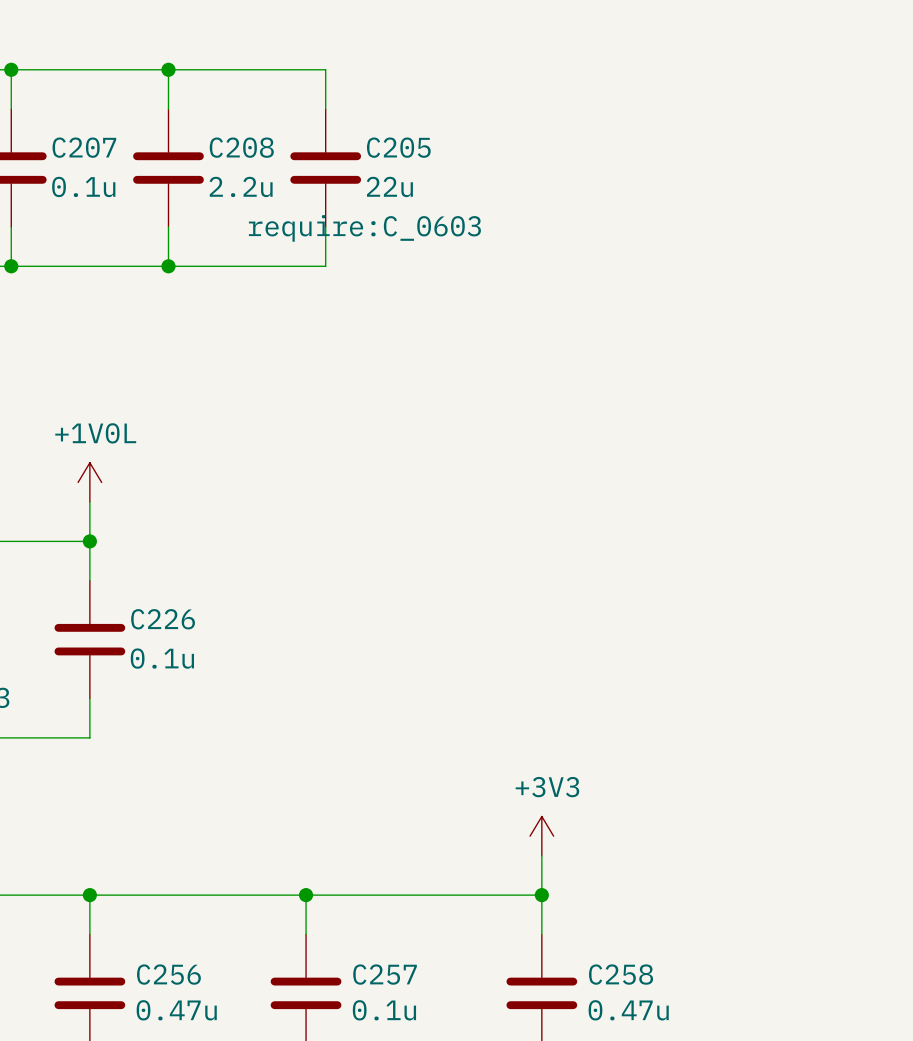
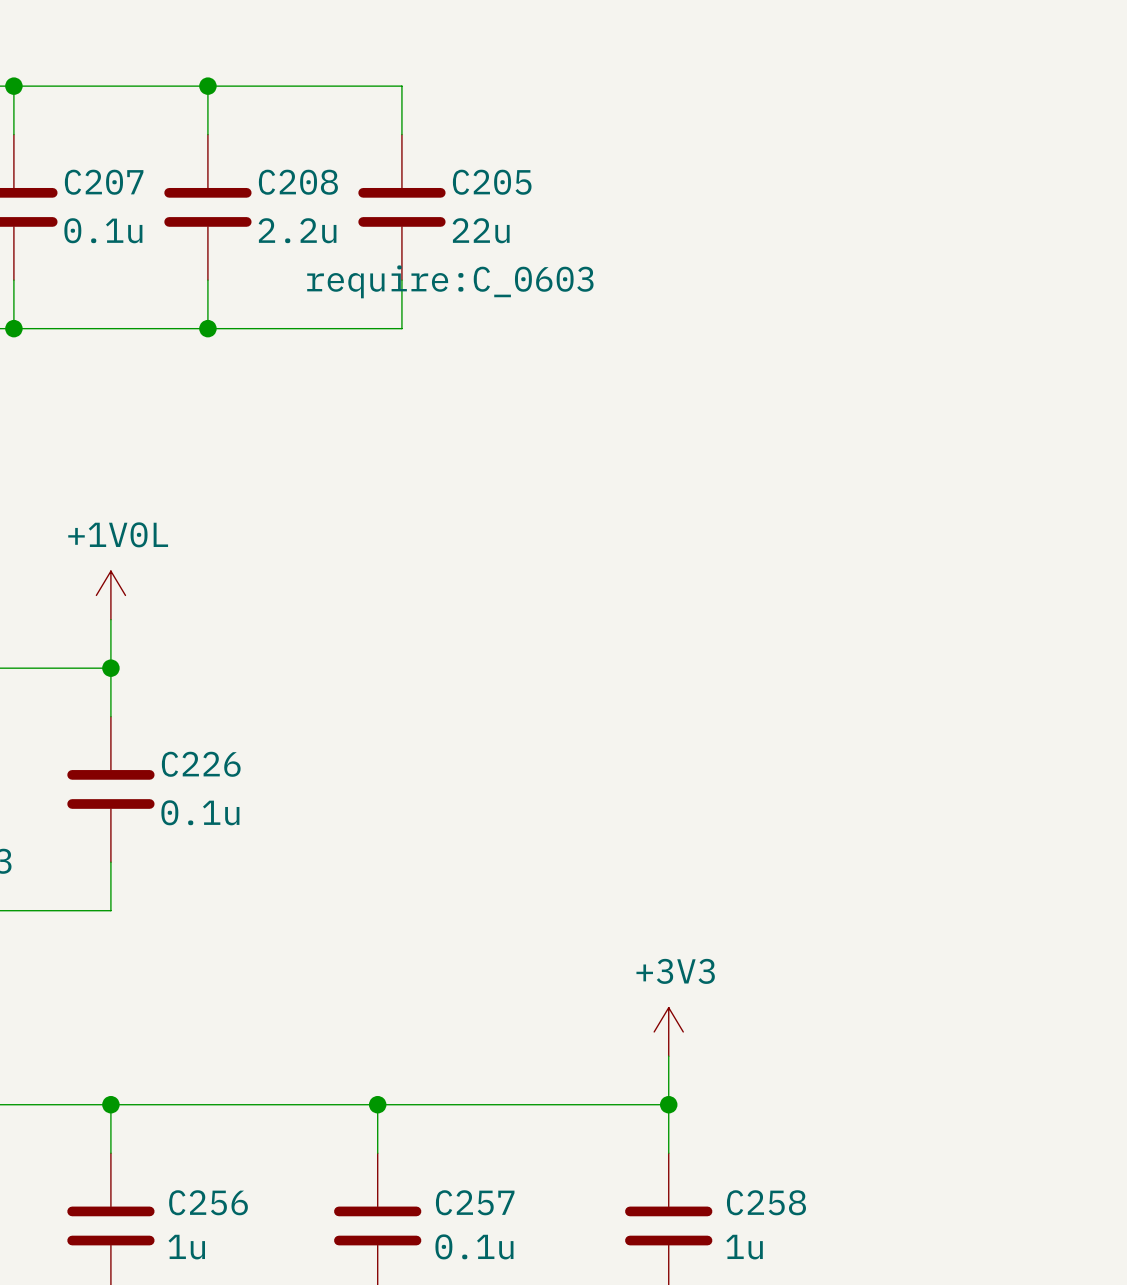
C256 value: 0.47u (176, 1010) -> 1u (186, 1247)
C258 value: 0.47u (628, 1010) -> 1u (744, 1247)

